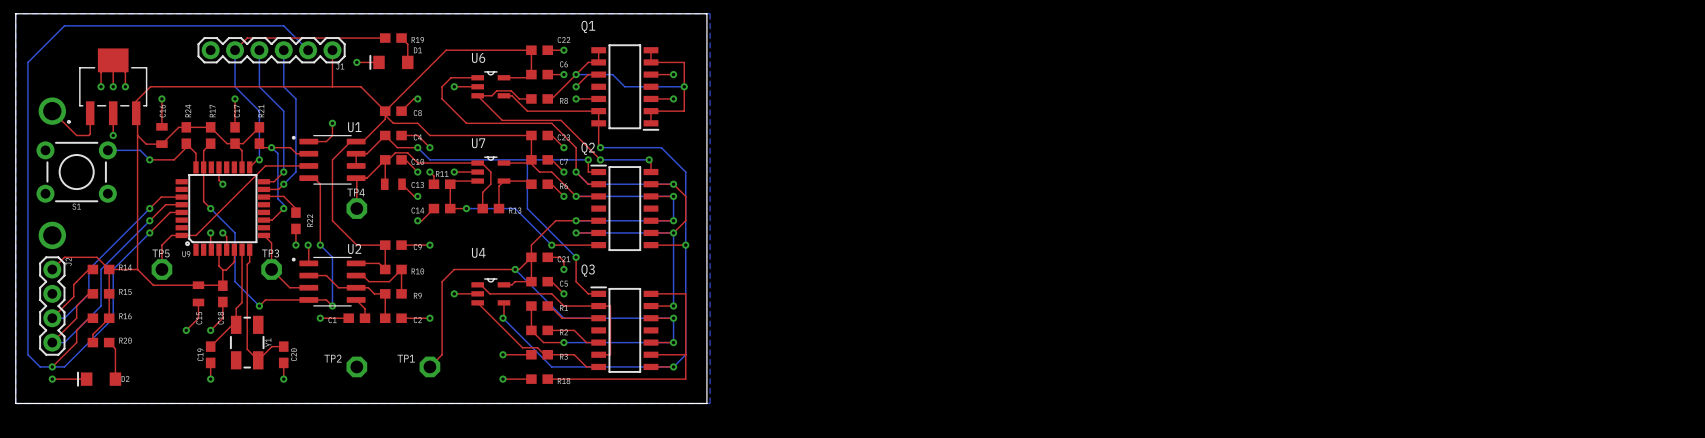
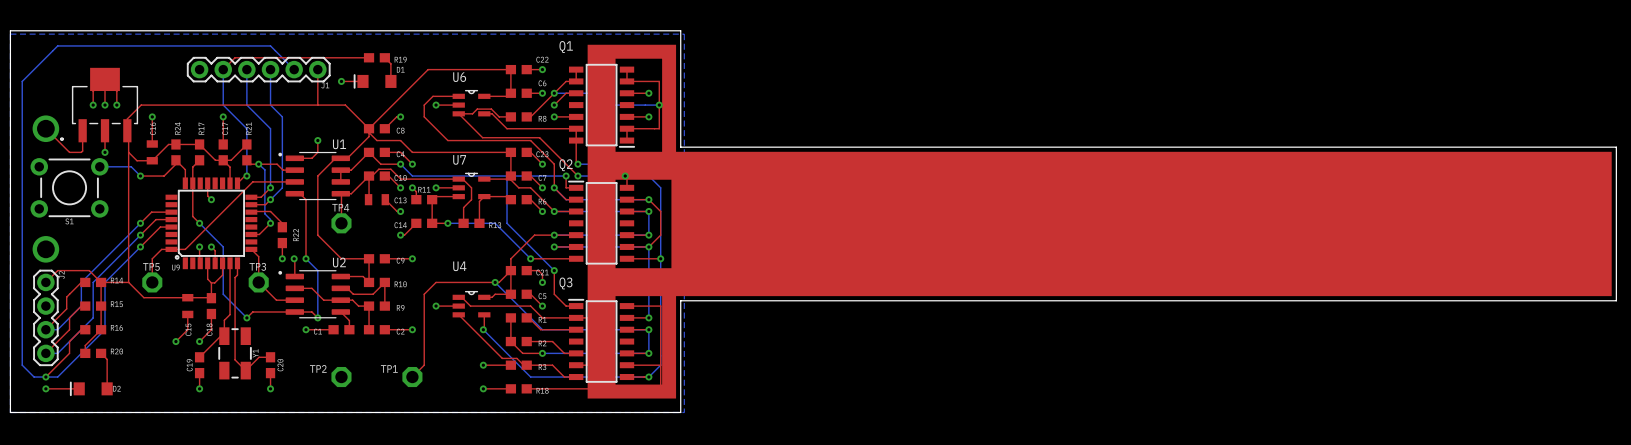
board edge: (15, 13) (706, 13) (706, 403) -> (10, 34) (10, 30) (680, 30) (680, 147) (1616, 147) (1616, 300) (680, 300) (680, 412)
drawing: none -> [587, 44, 1612, 399]

